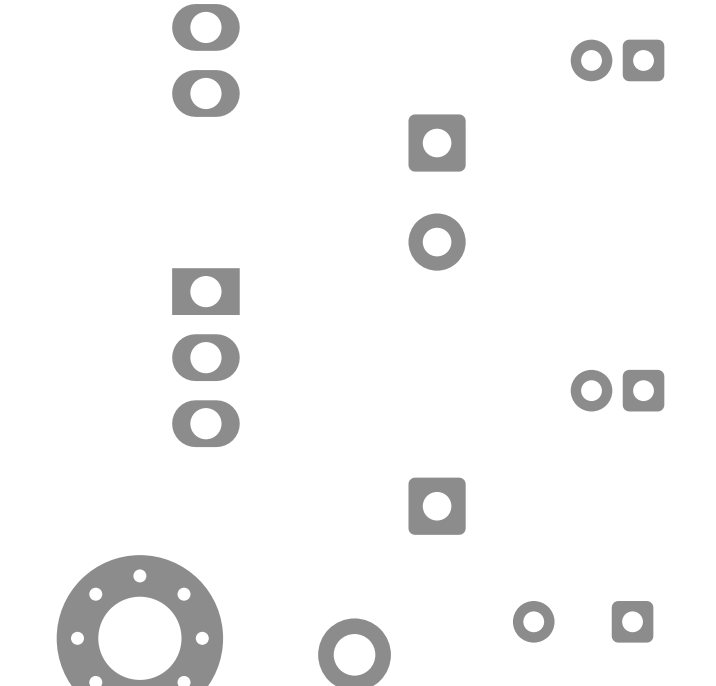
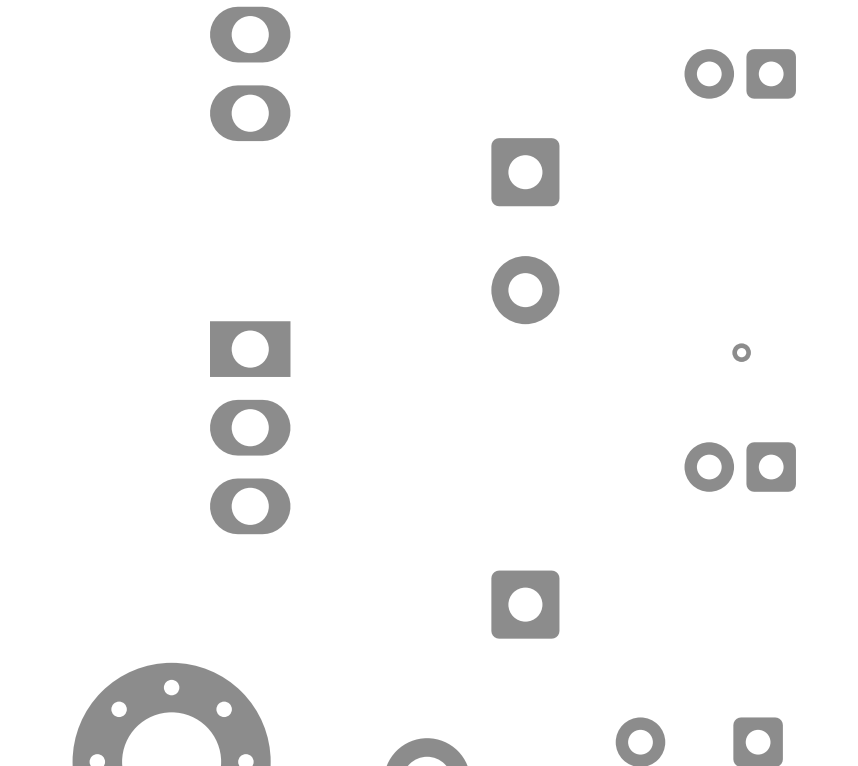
via: none -> (741, 352)

